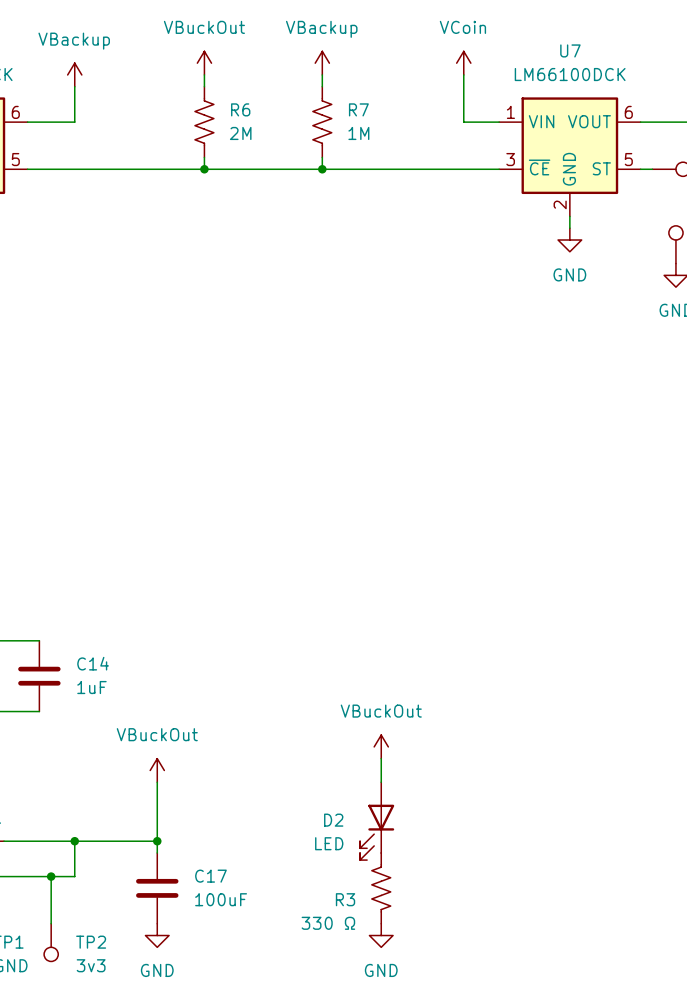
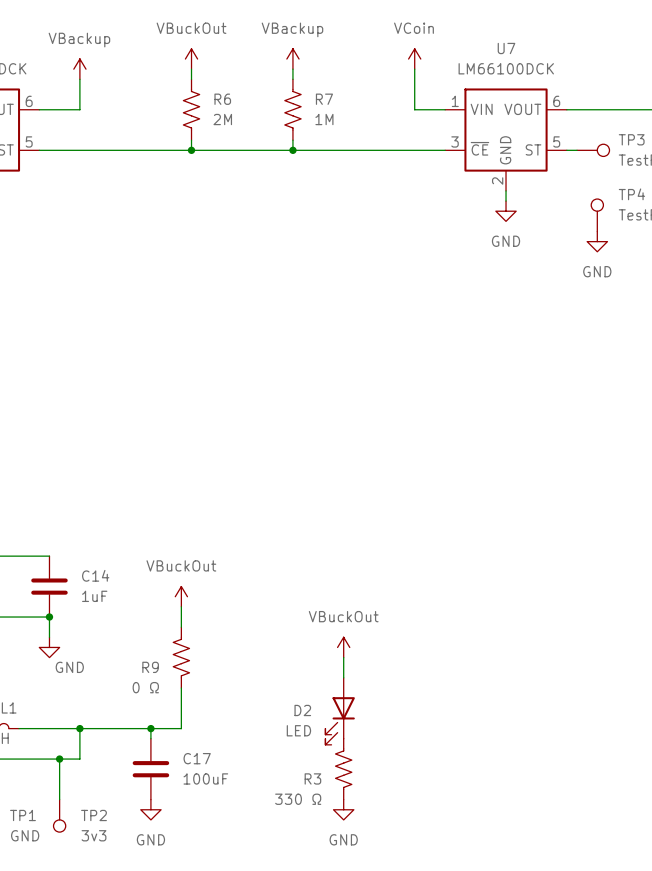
wire: none -> (181, 606) (181, 627)
wire: none -> (49, 617) (49, 637)
junction: none -> (49, 617)
power symbol: none -> GND (49, 647)
R9: none -> 0 Ω (181, 657)
power symbol position: VBuckOut (157, 770) -> VBuckOut (181, 596)
wire: (157, 782) (157, 841) -> (181, 688) (181, 728) (150, 728)

